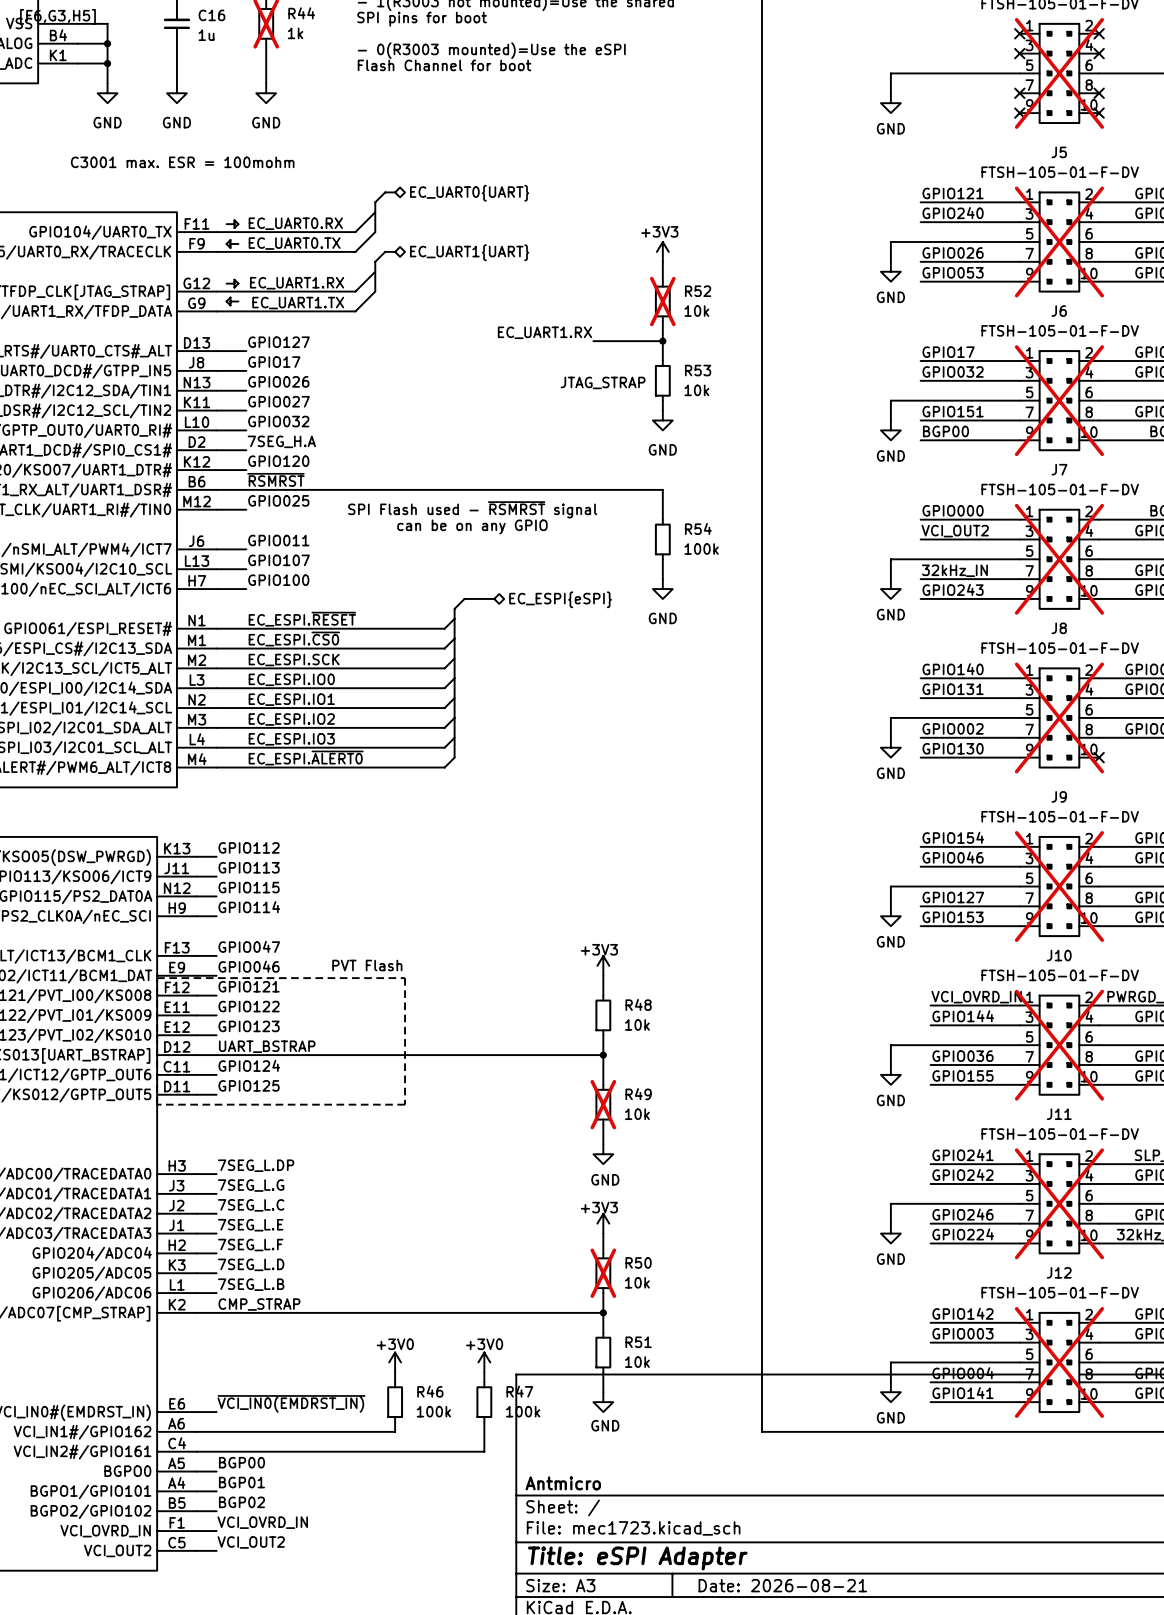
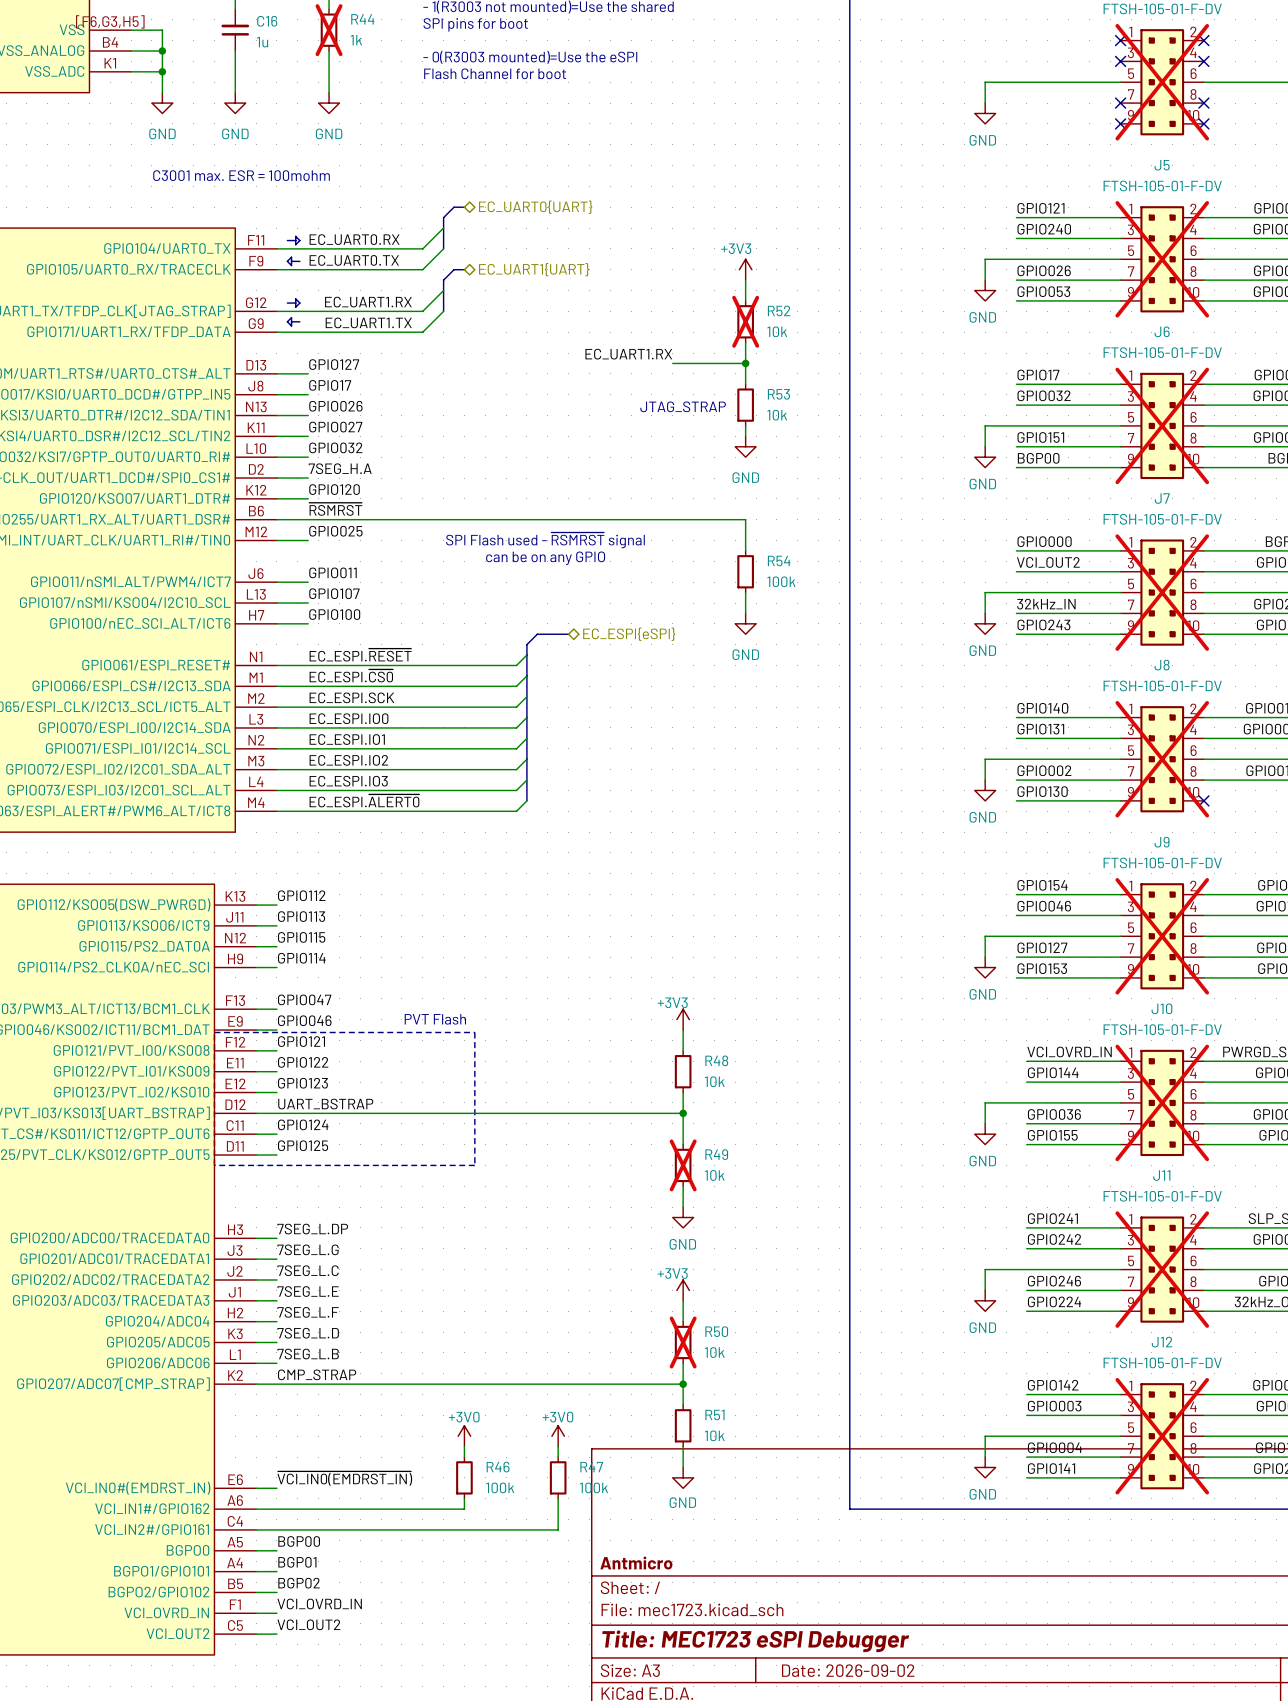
title block: Title: eSPI Adapter (637, 1558) -> Title: MEC1723 eSPI Debugger (755, 1641)
title block: Date: 2026-08-21 (782, 1585) -> Date: 2026-09-02 (848, 1670)

